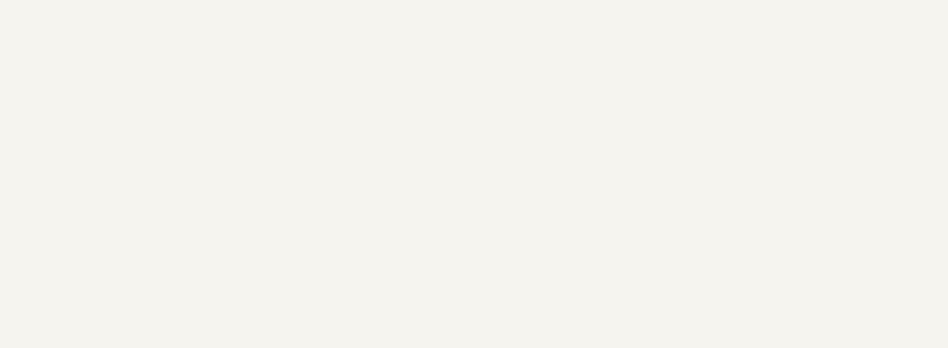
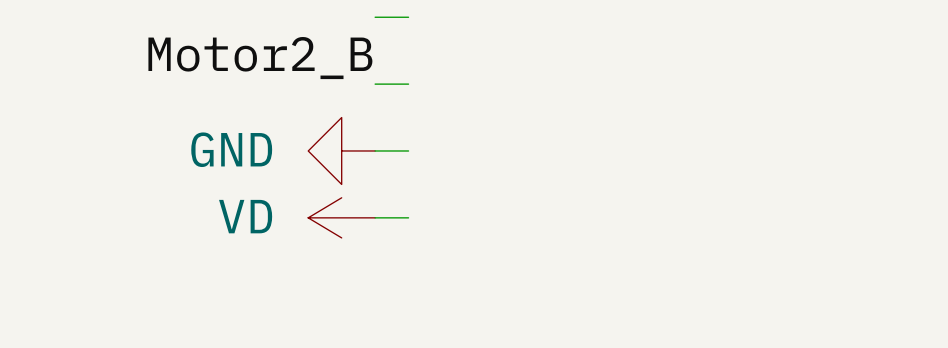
wire: none -> (375, 17) (408, 17)
label: none -> Motor2_B (260, 58)
wire: none -> (375, 84) (408, 84)
power symbol: none -> GND (341, 150)
wire: none -> (375, 150) (408, 150)
power symbol: none -> VD (341, 217)
wire: none -> (375, 217) (408, 217)

